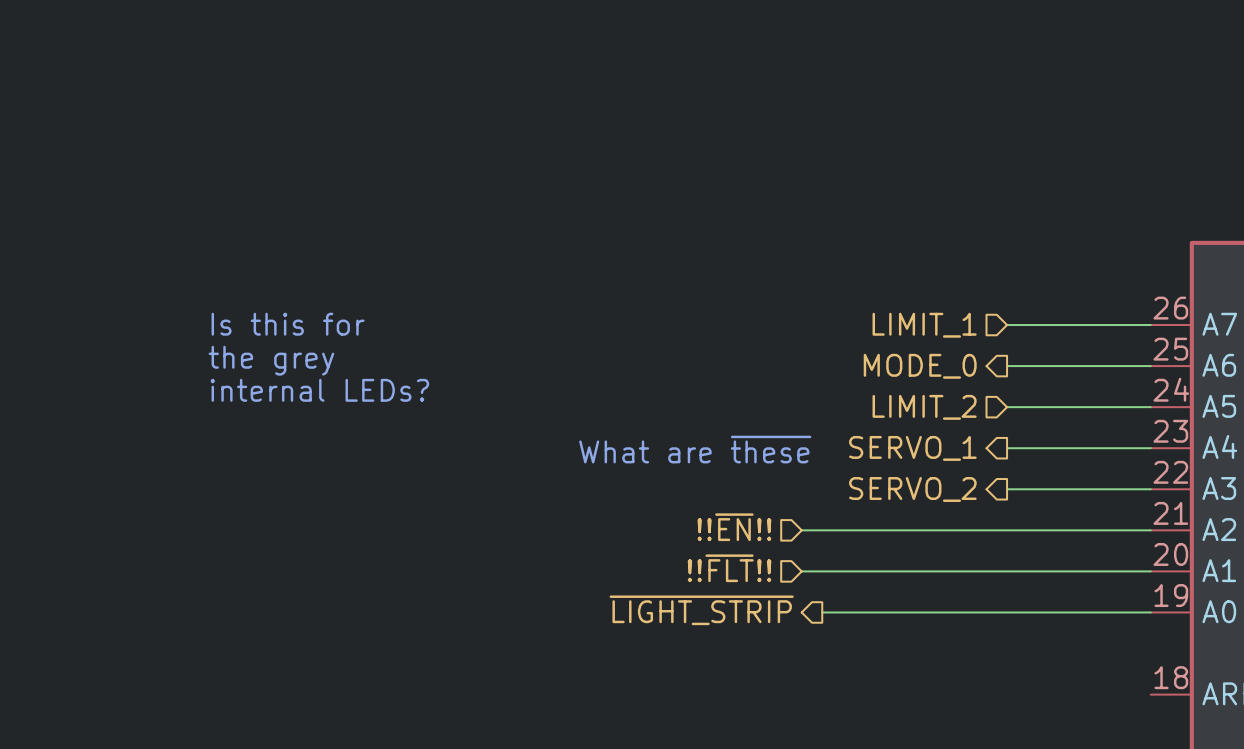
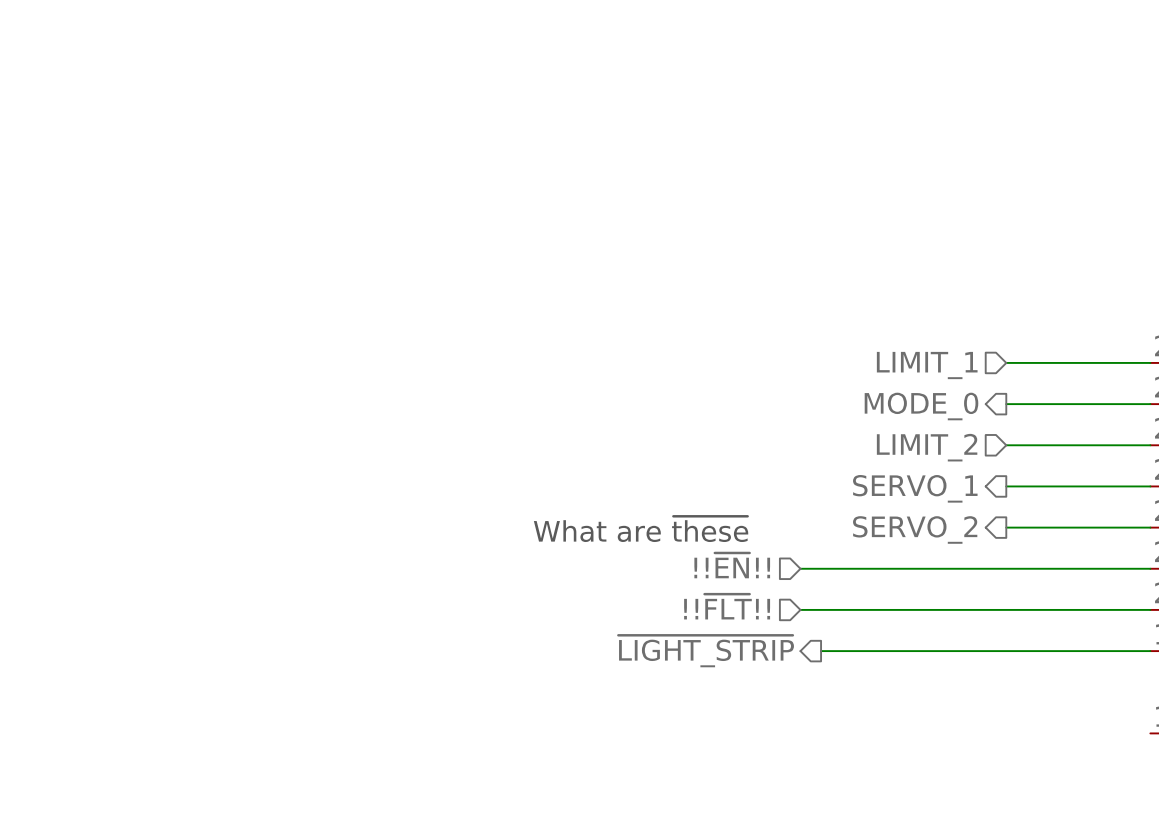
text: Is this for (288, 324) -> none
text: the grey (271, 360) -> none
text: internal LEDs? (319, 390) -> none
text position: What are ~{these} (695, 449) -> What are ~{these} (641, 529)

